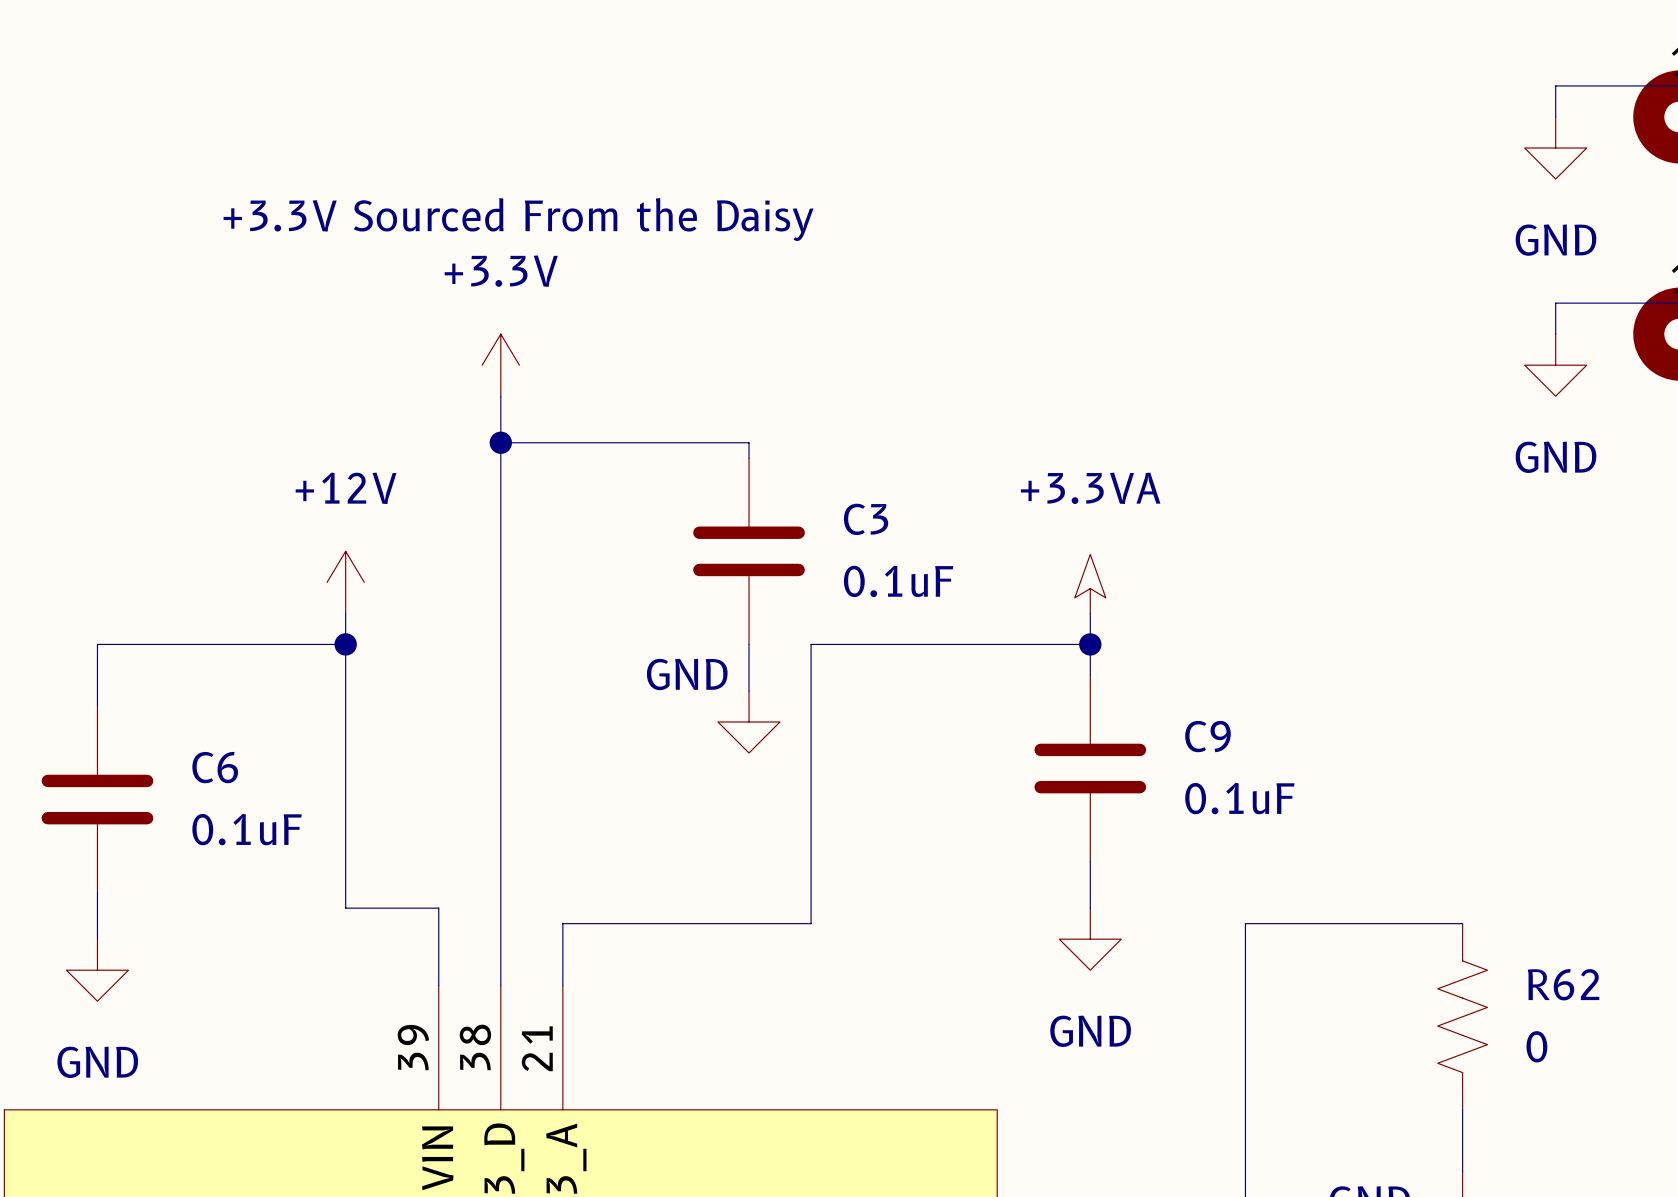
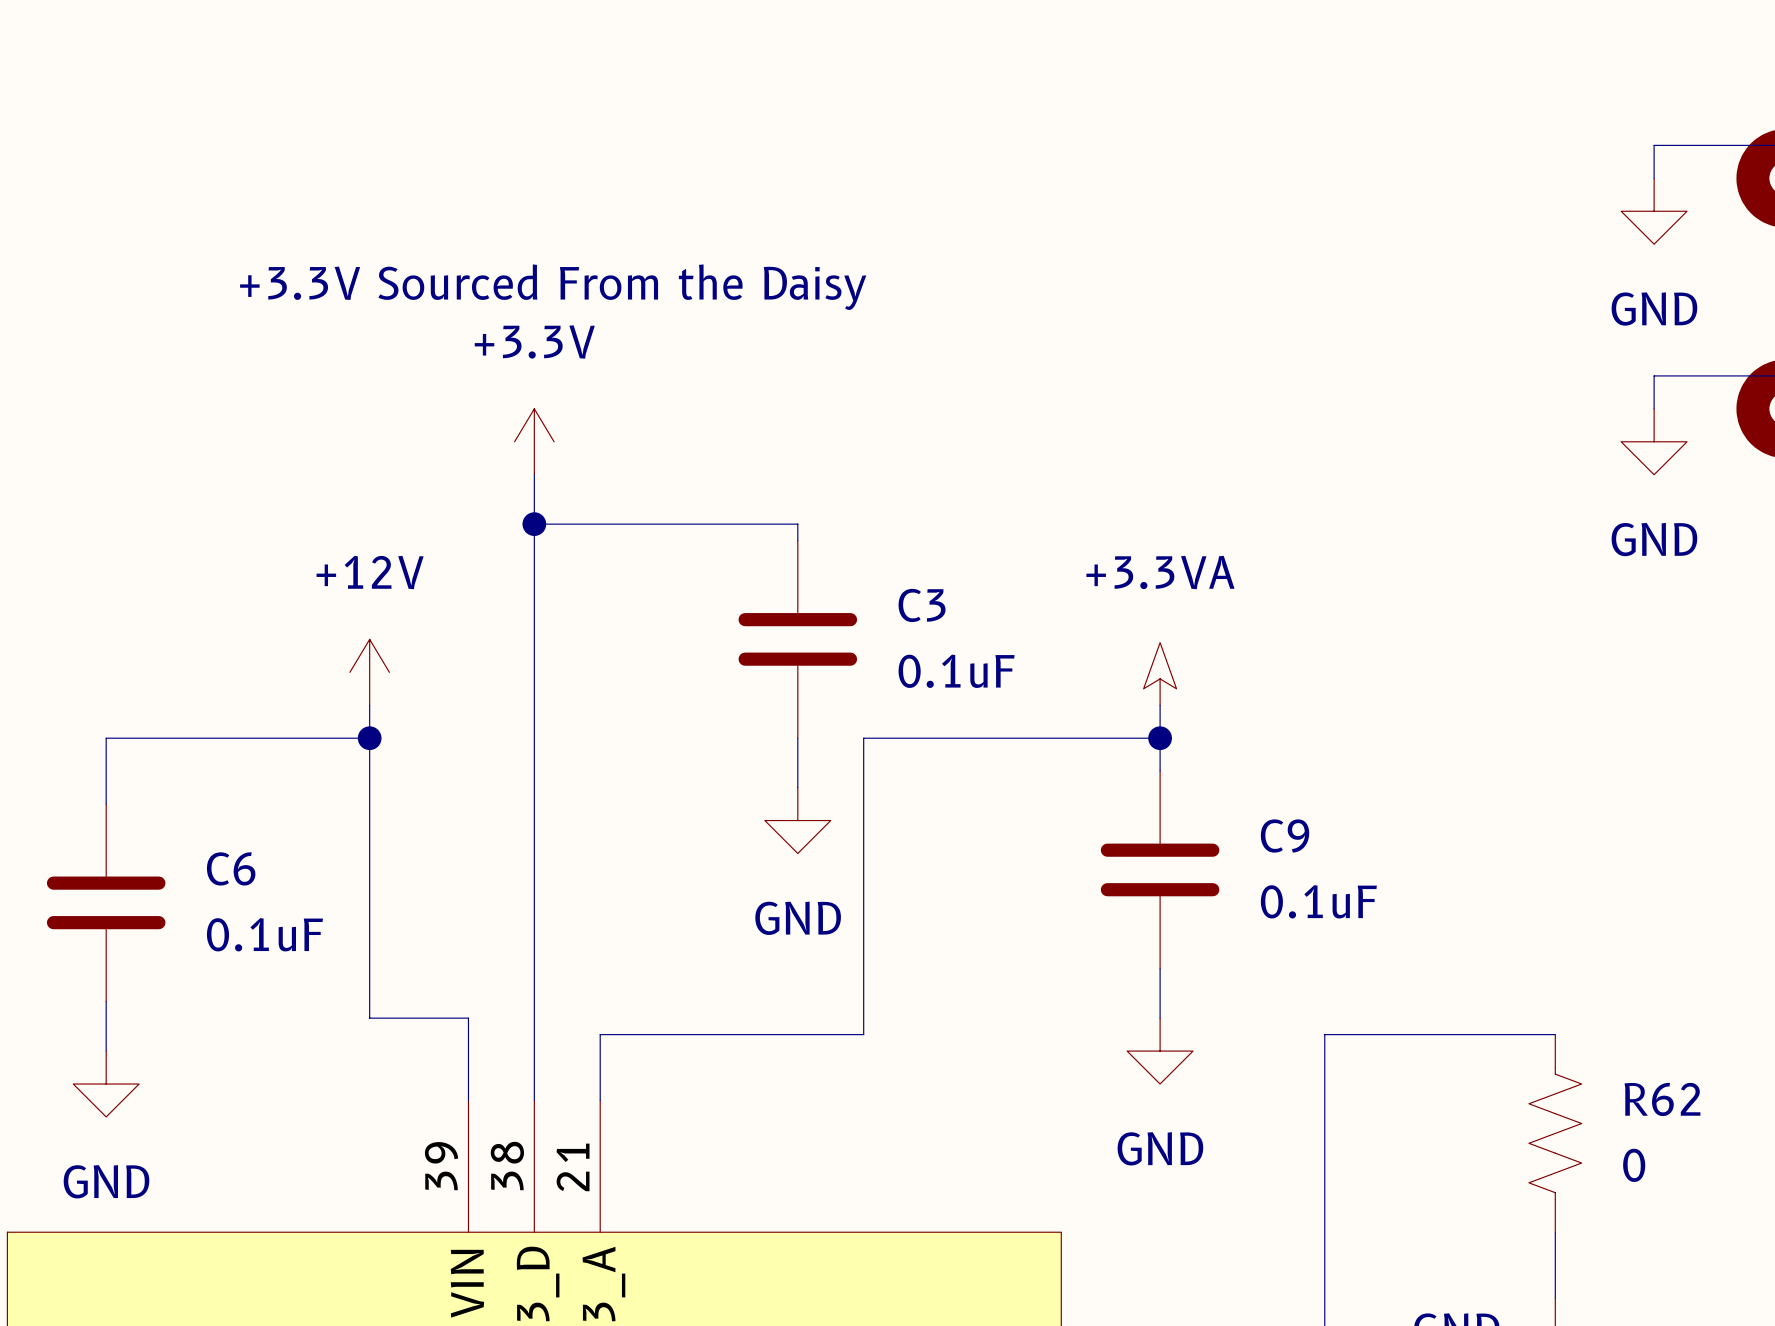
power symbol text position: GND (687, 674) -> GND (798, 918)

